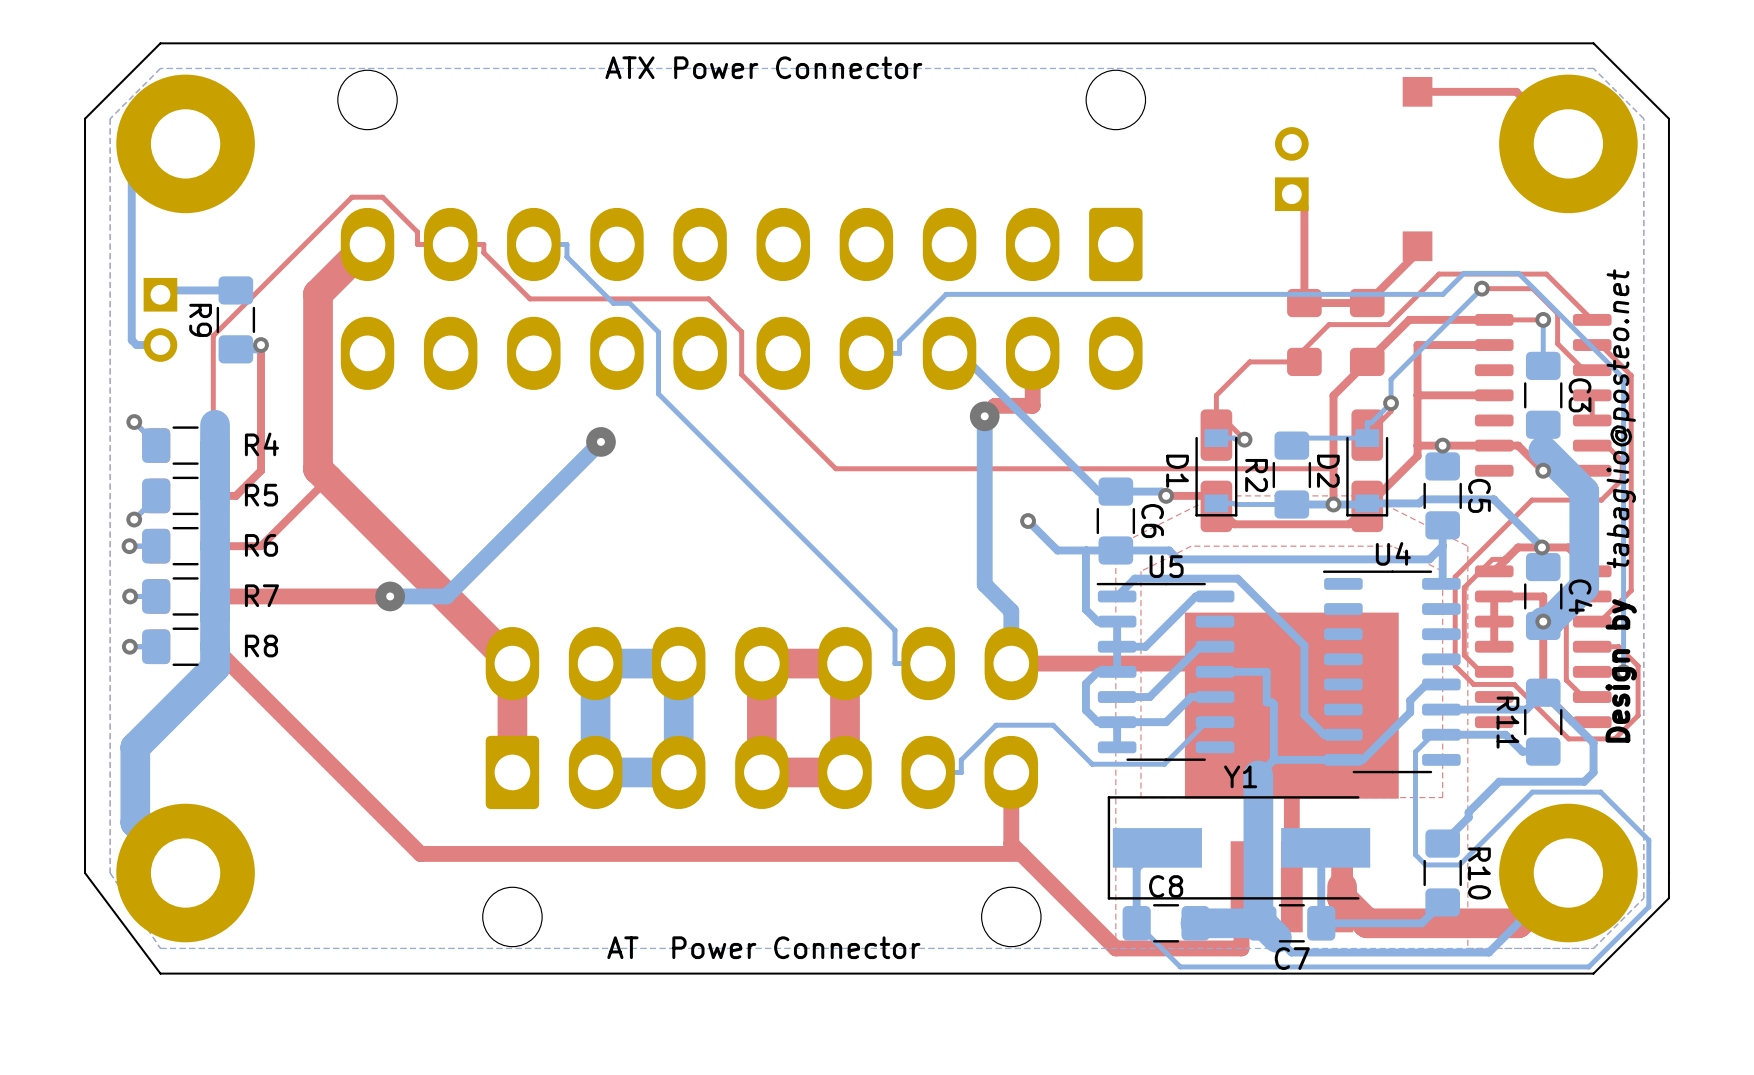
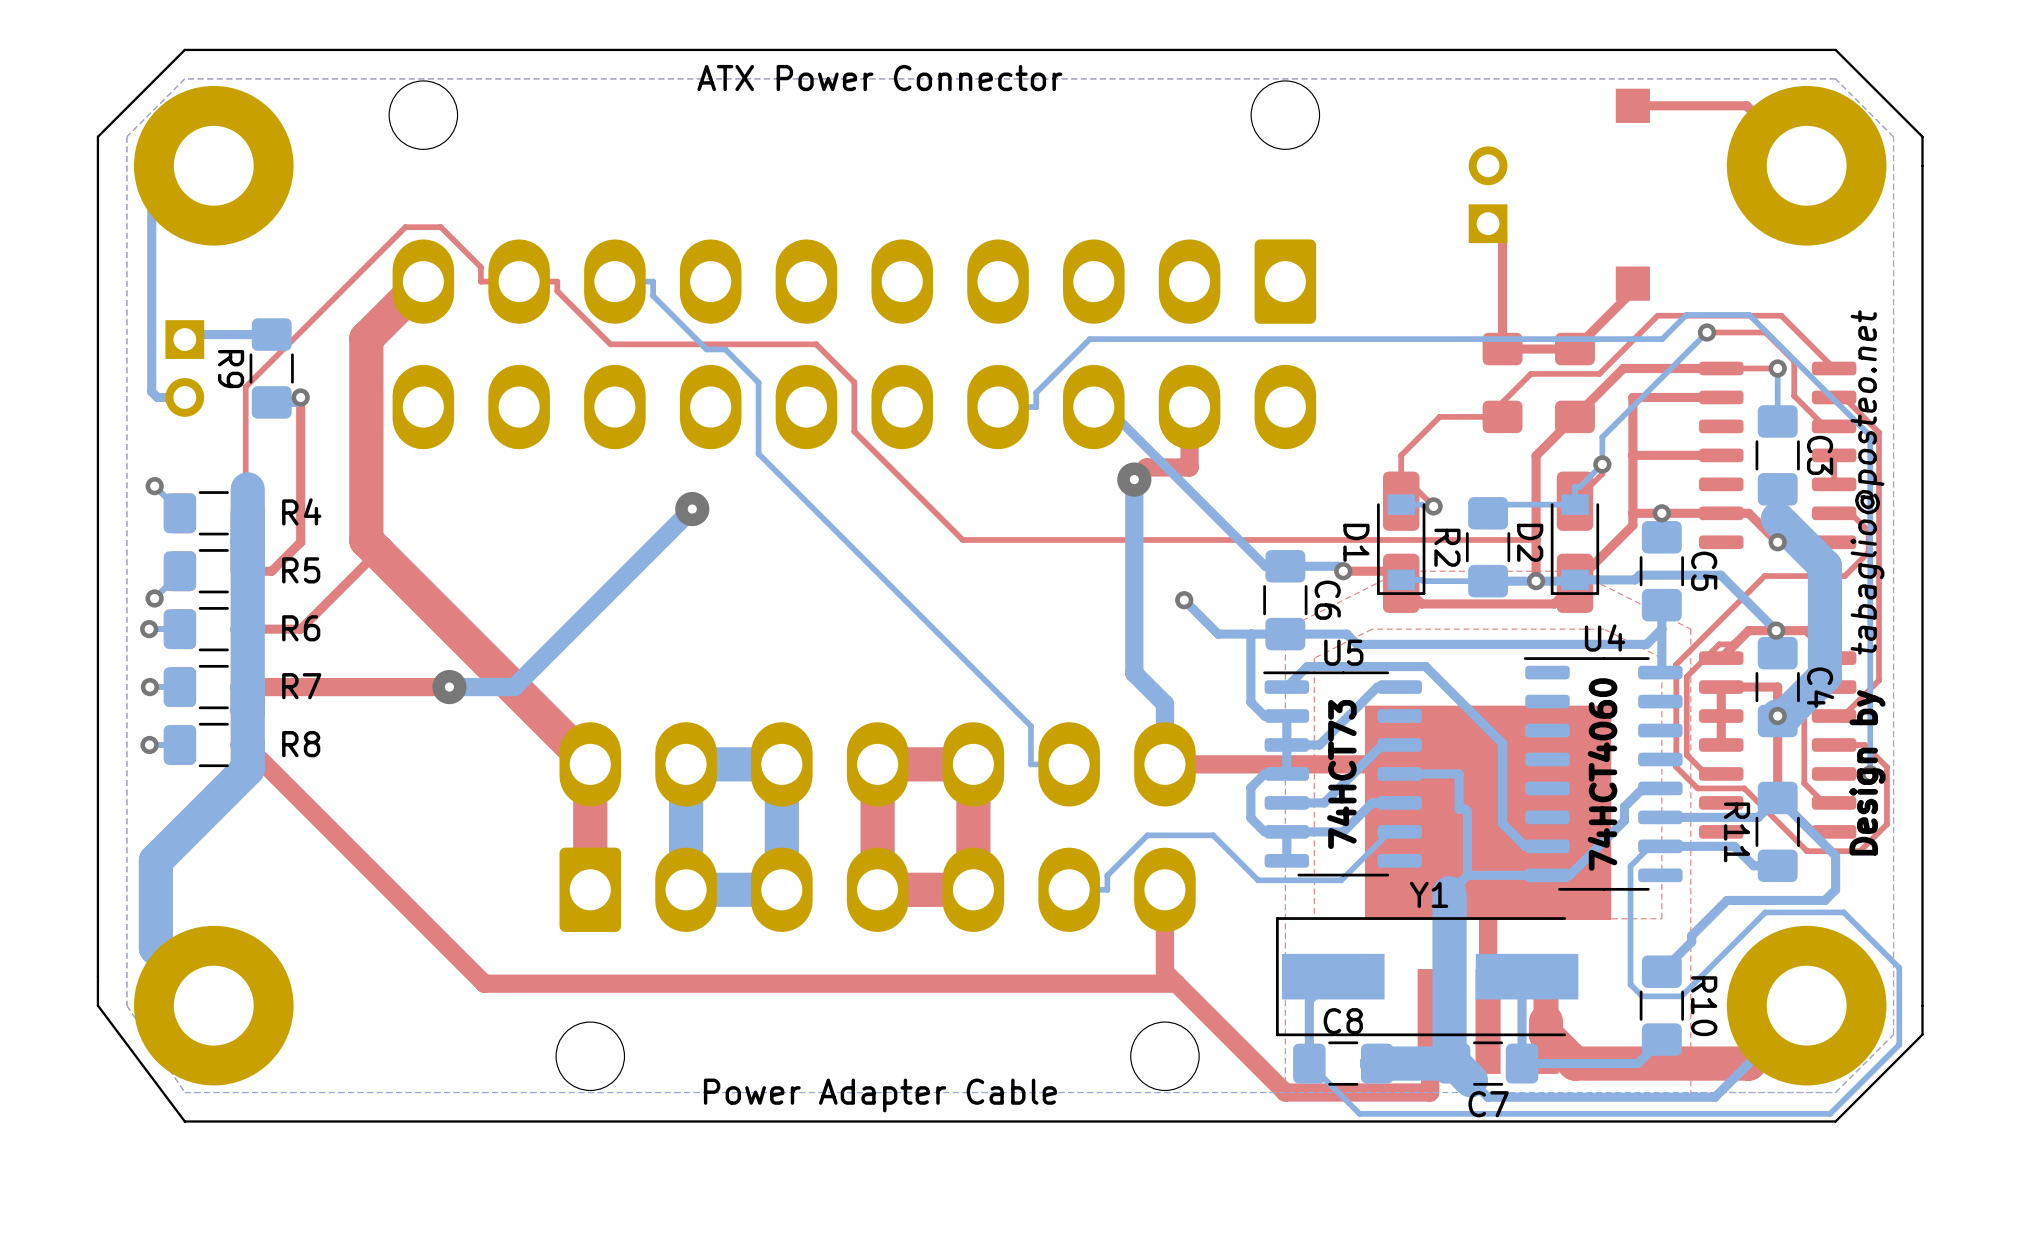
text: none -> 74HCT73 (1341, 774)
text: none -> 74HCT4060 (1602, 774)
text: AT Power Connector (763, 947) -> Power Adapter Cable (880, 1095)

